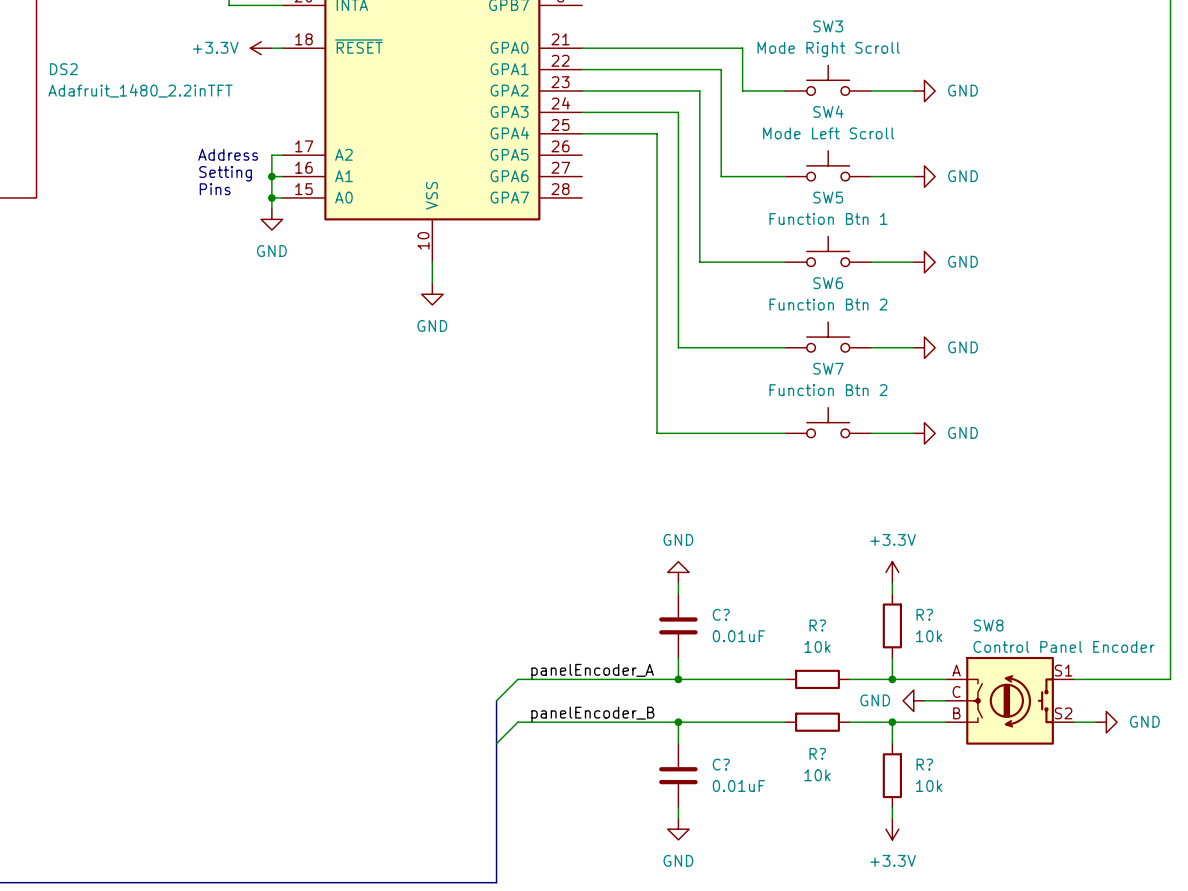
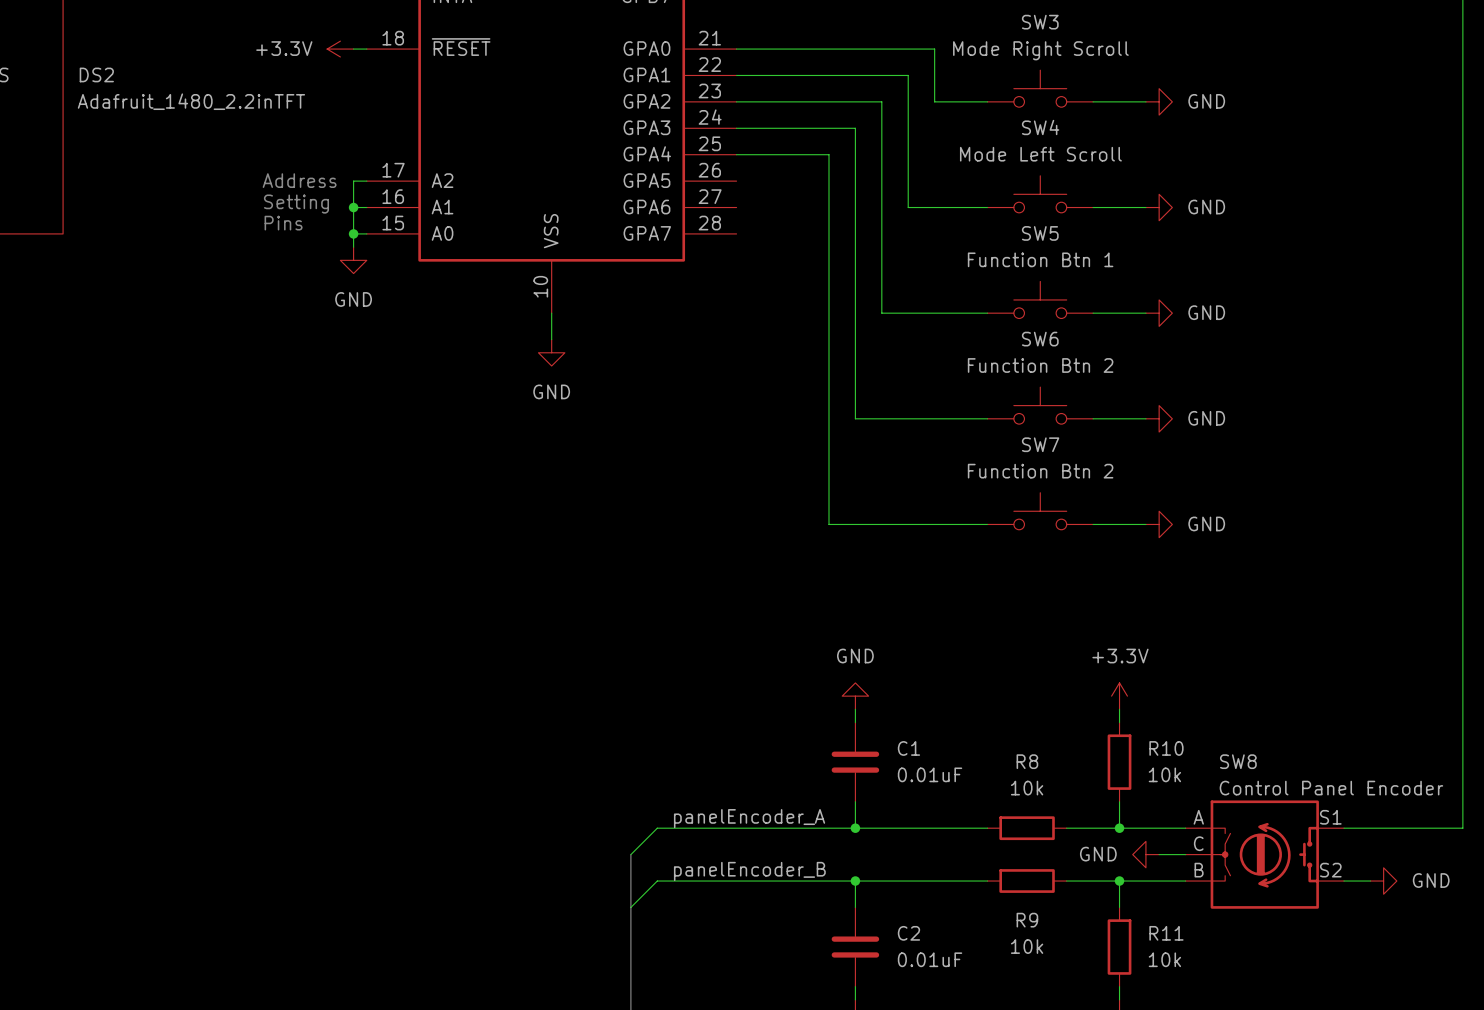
C? name: C? (721, 614) -> C1 (908, 748)
R? name: R? (924, 614) -> R10 (1166, 748)
R? name: R? (817, 625) -> R8 (1027, 761)
R? name: R? (817, 753) -> R9 (1027, 920)
C? name: C? (721, 764) -> C2 (908, 933)
R? name: R? (924, 764) -> R11 (1166, 933)

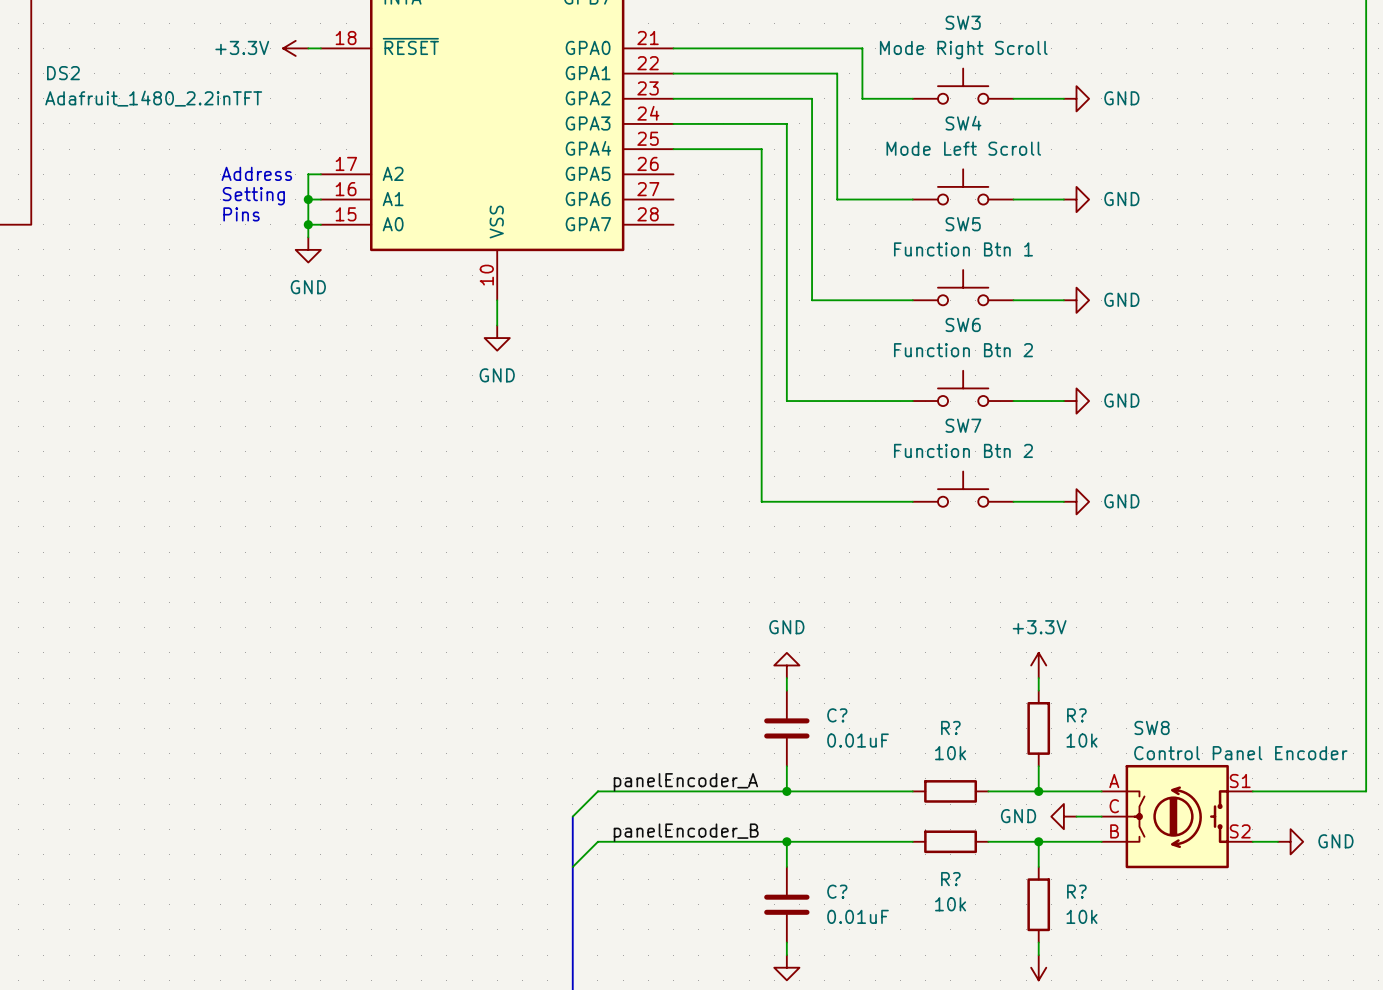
C1 name: C1 (908, 748) -> C? (837, 715)
R10 name: R10 (1166, 748) -> R? (1076, 715)
R8 name: R8 (1027, 761) -> R? (950, 727)
R9 name: R9 (1027, 920) -> R? (950, 879)
C2 name: C2 (908, 933) -> C? (837, 891)
R11 name: R11 (1166, 933) -> R? (1076, 891)

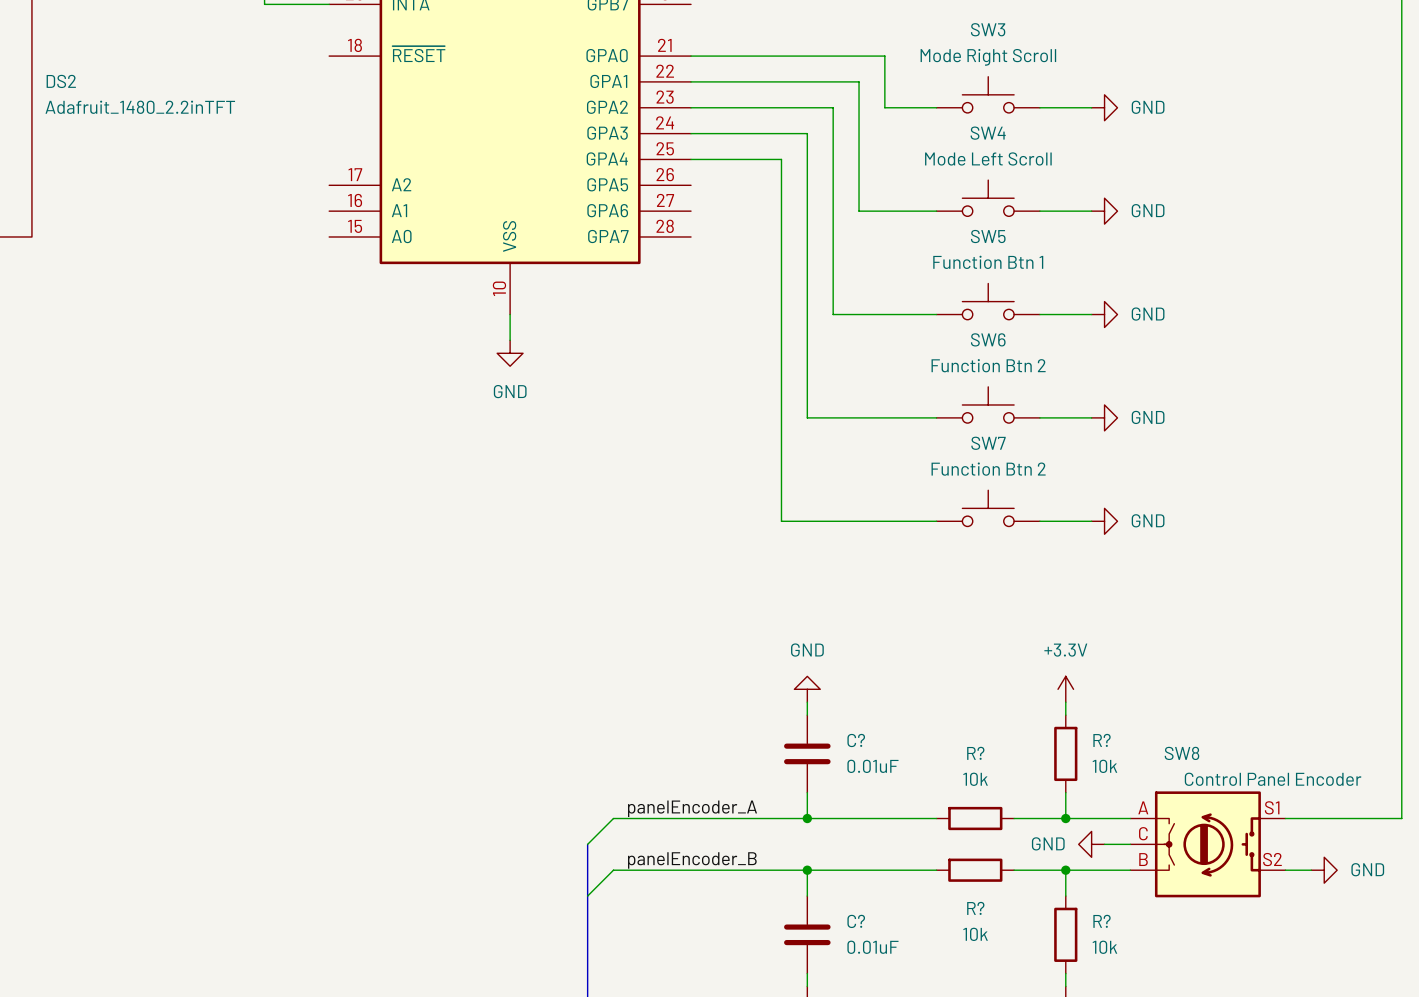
power symbol: +3.3V (295, 48) -> none
wire: (308, 48) (320, 48) -> none
text: Address (256, 173) -> none
wire: (320, 174) (308, 174) (308, 237) -> none
text: Setting (253, 196) -> none
wire: (308, 199) (320, 199) -> none
junction: (308, 199) -> none
text: Pins (241, 214) -> none
wire: (308, 224) (320, 224) -> none
junction: (308, 224) -> none
power symbol: GND (308, 249) -> none

